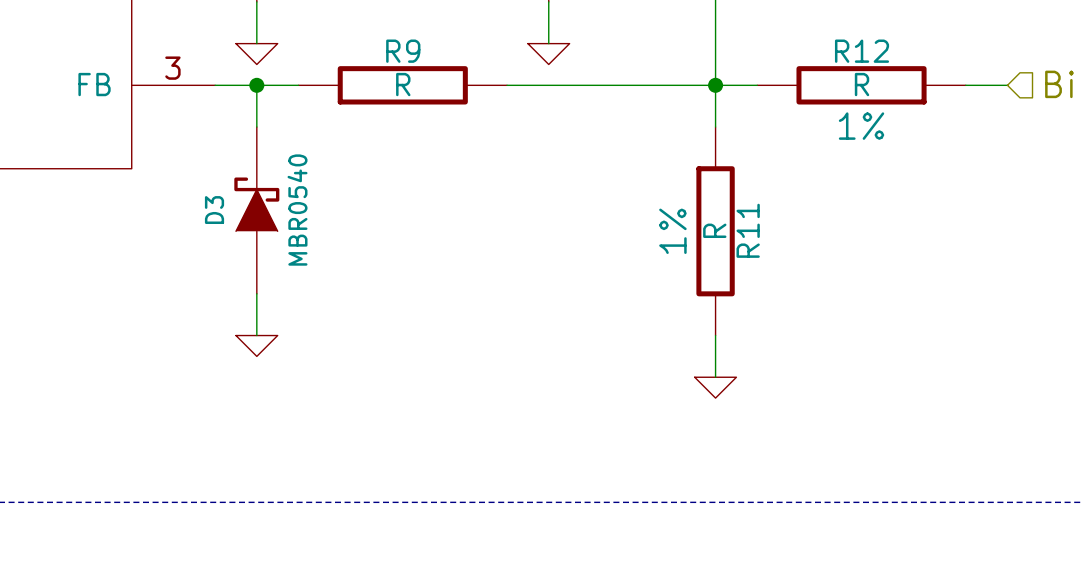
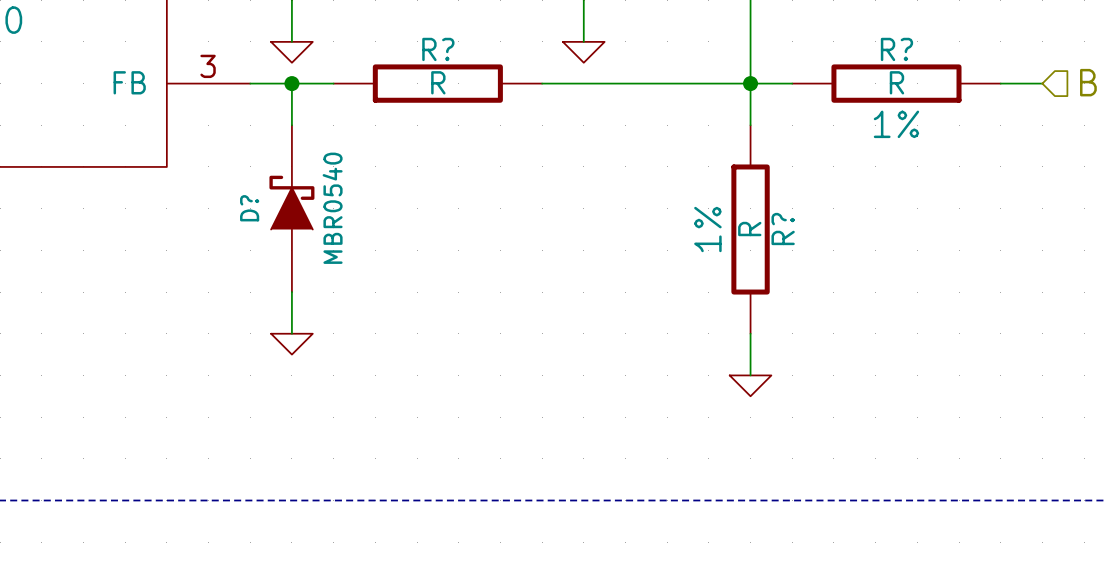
R9 name: R9 (403, 51) -> R? (438, 49)
R12 name: R12 (862, 51) -> R? (896, 49)
D3 name: D3 (214, 210) -> D? (249, 208)
R11 name: R11 (748, 230) -> R? (783, 229)

